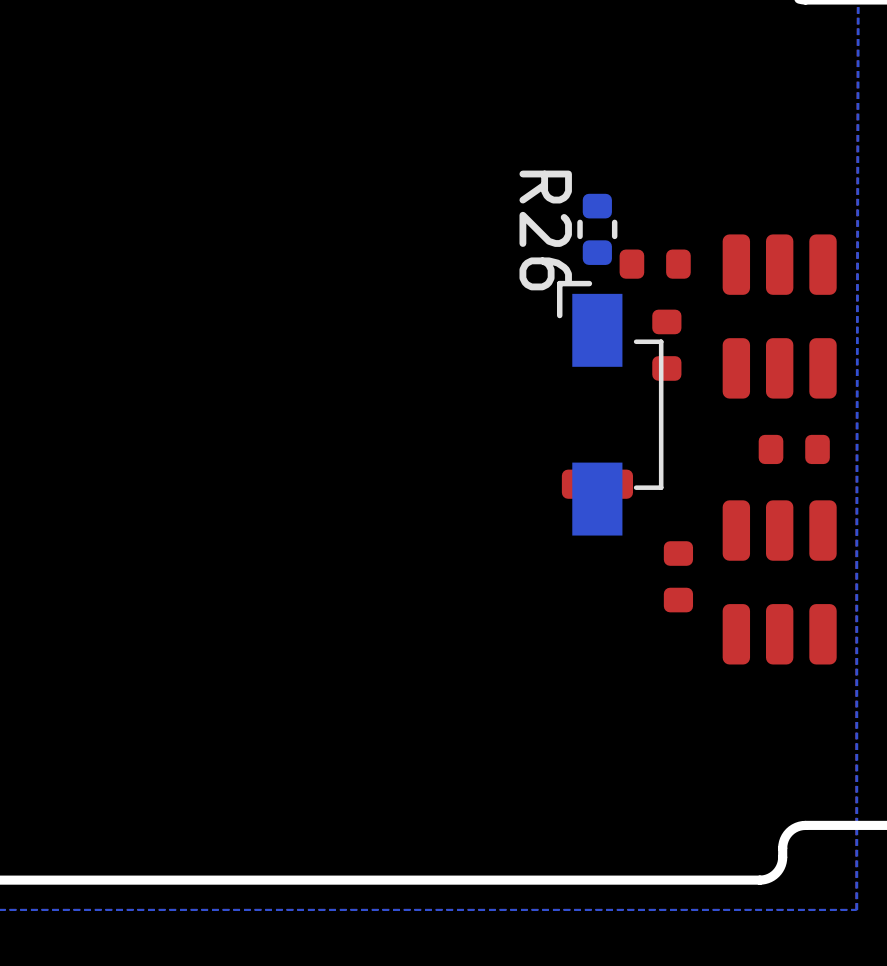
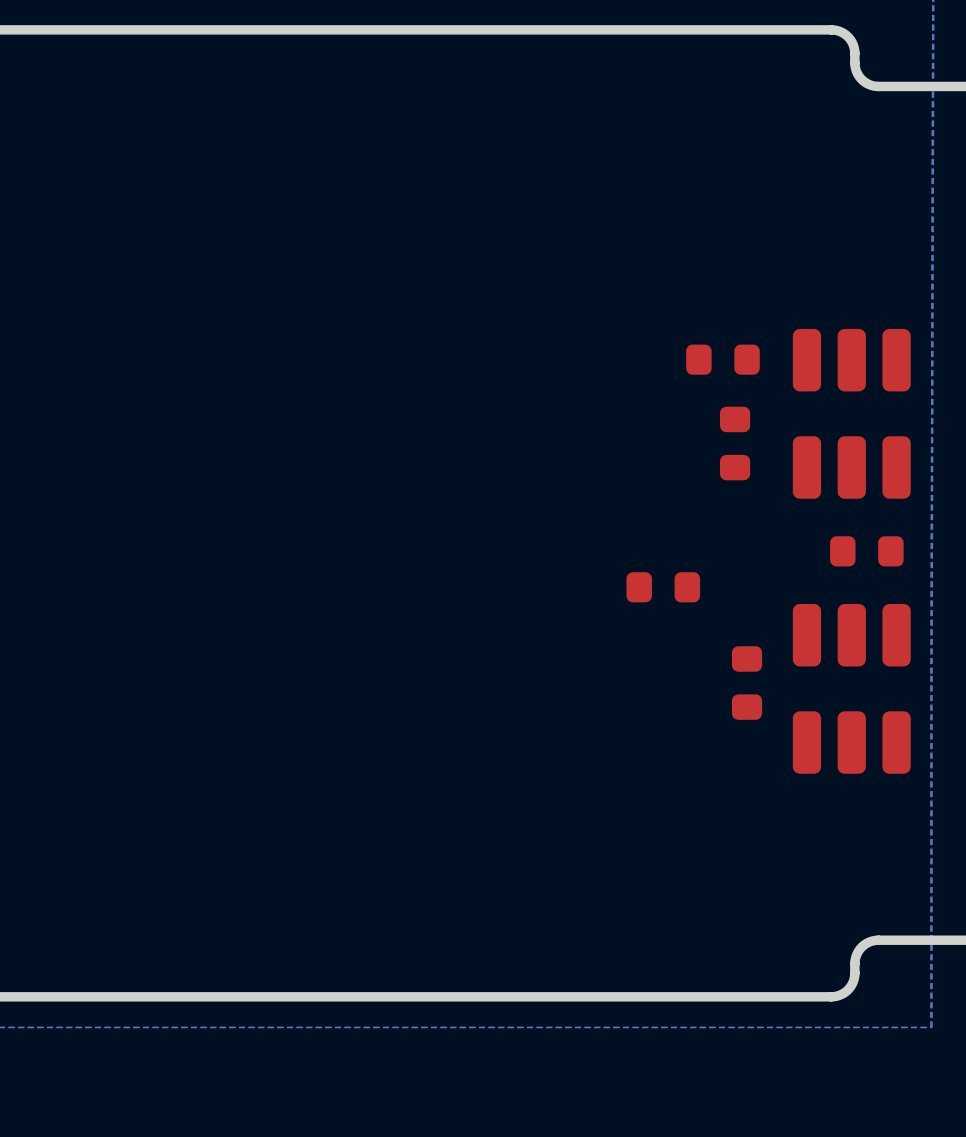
R26: (597, 229) -> none
part: (610, 408) -> none

